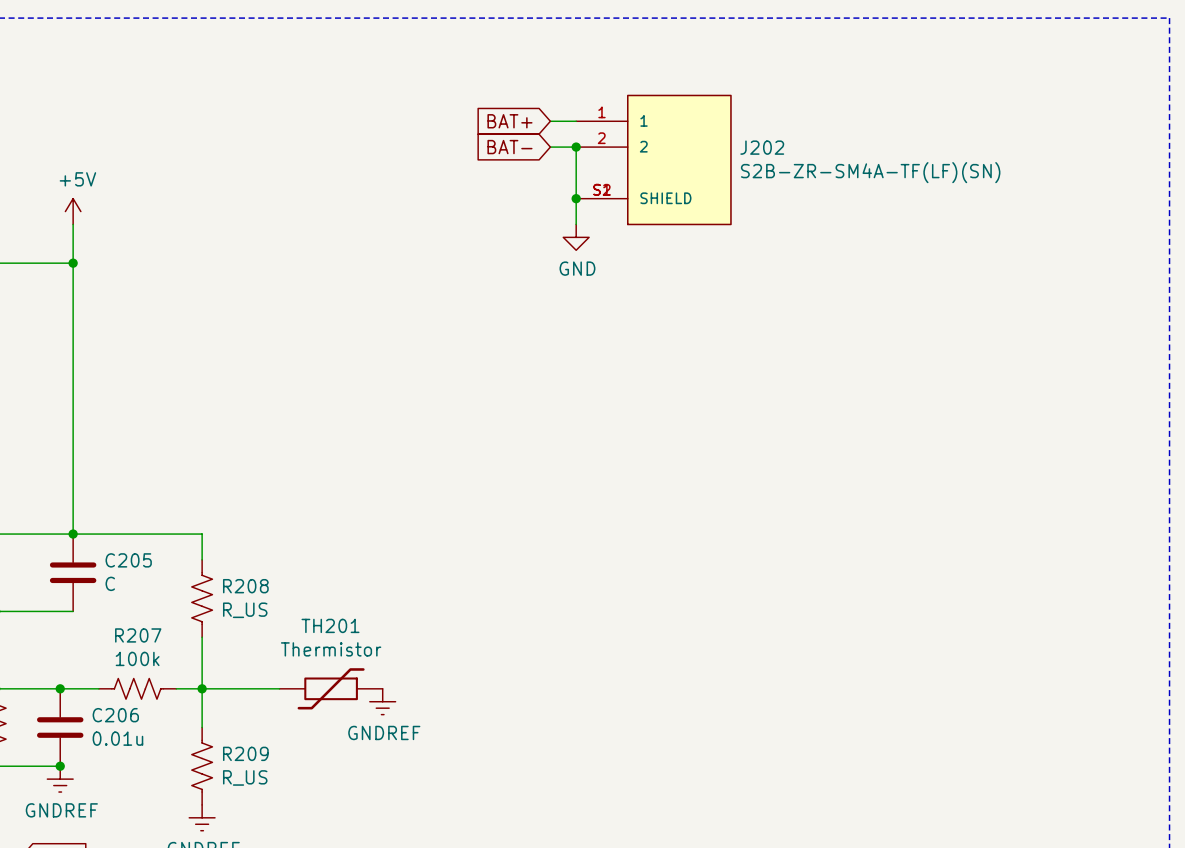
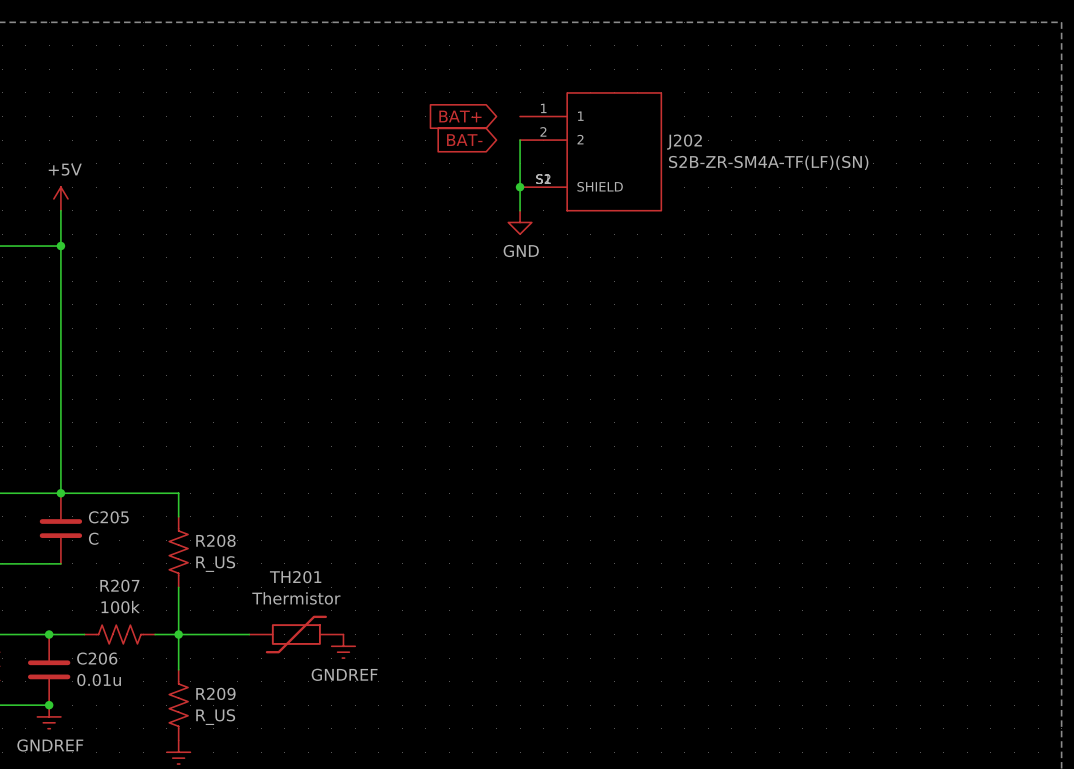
wire: (550, 121) (576, 121) -> none
wire: (550, 147) (576, 147) -> none
junction: (576, 147) -> none

